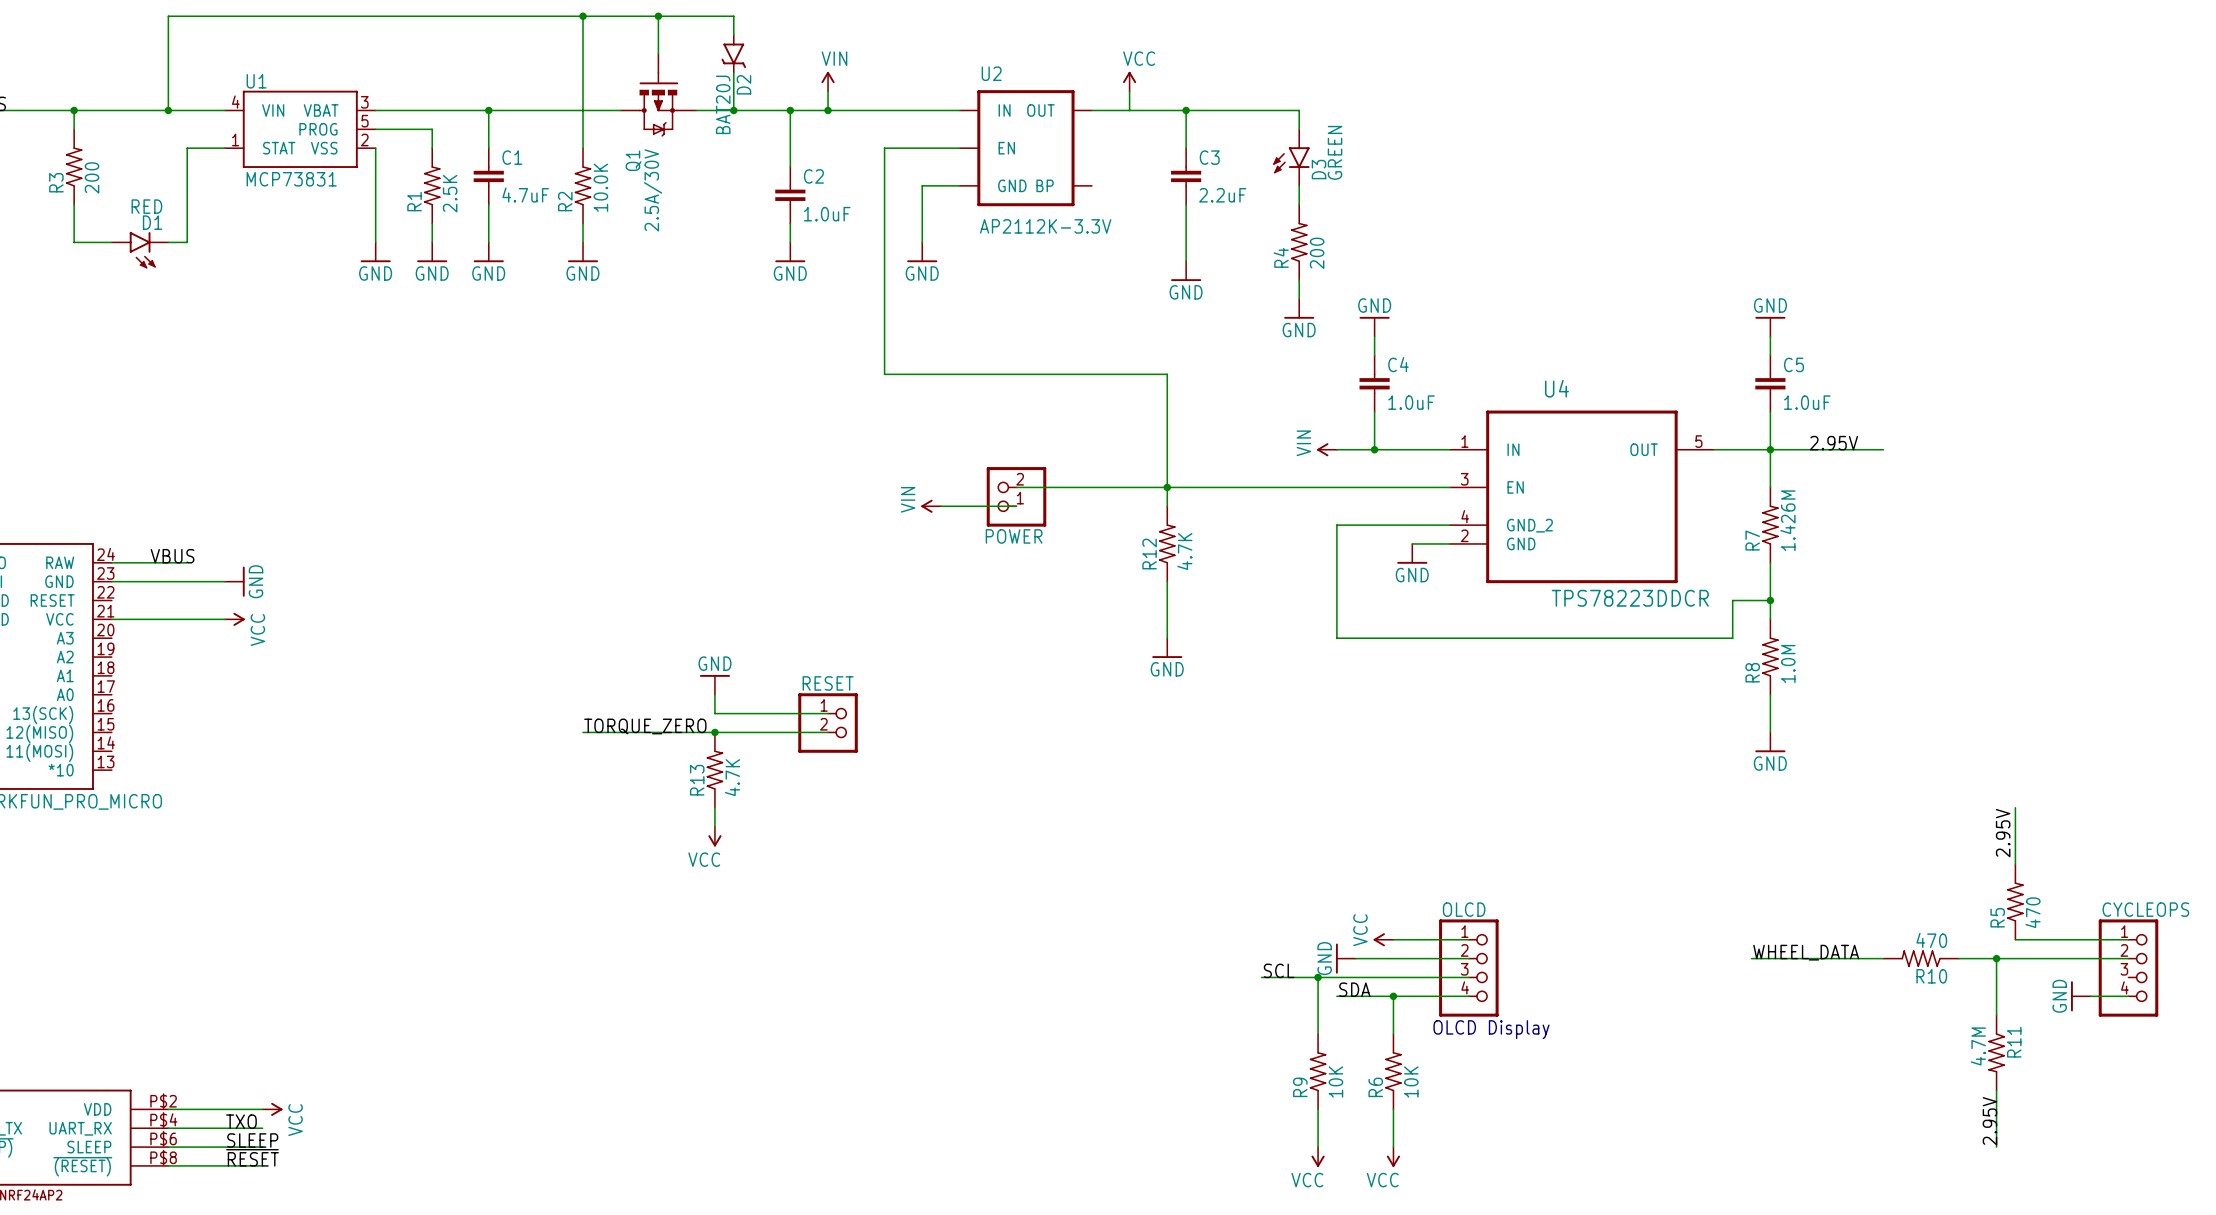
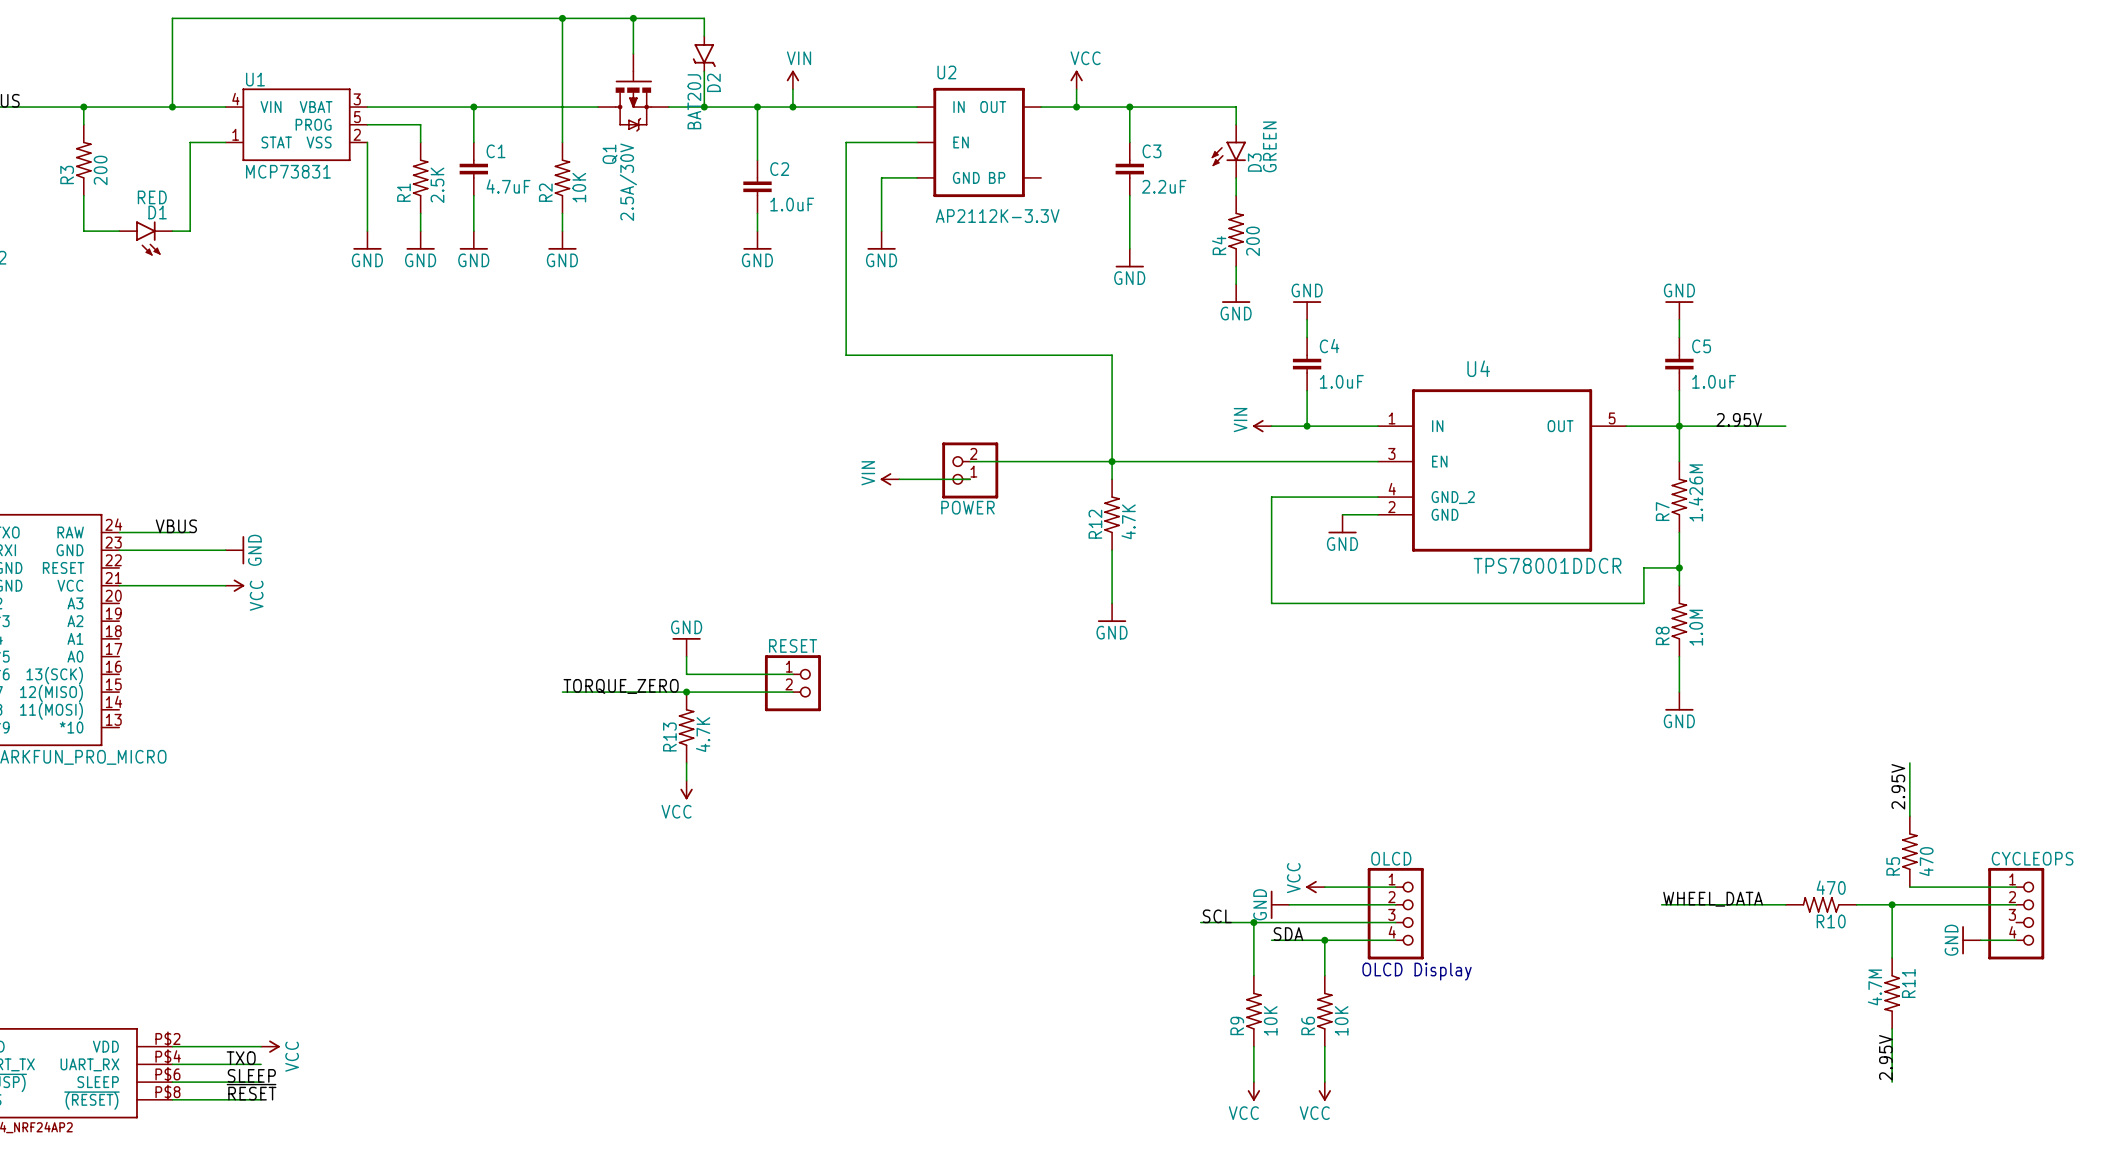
junction: none -> (1076, 107)
R2 value: 10.0K (600, 187) -> 10K (579, 187)
U4 value: TPS78223DDCR (1630, 598) -> TPS78001DDCR (1547, 565)

